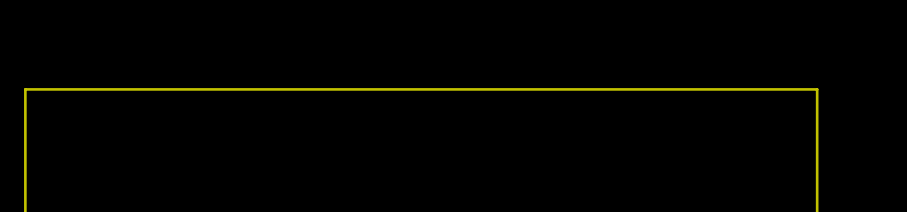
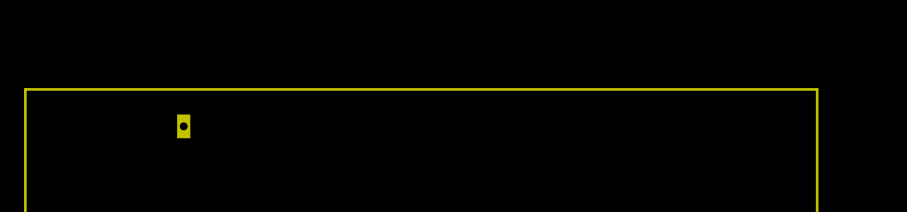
part: none -> (183, 126)

